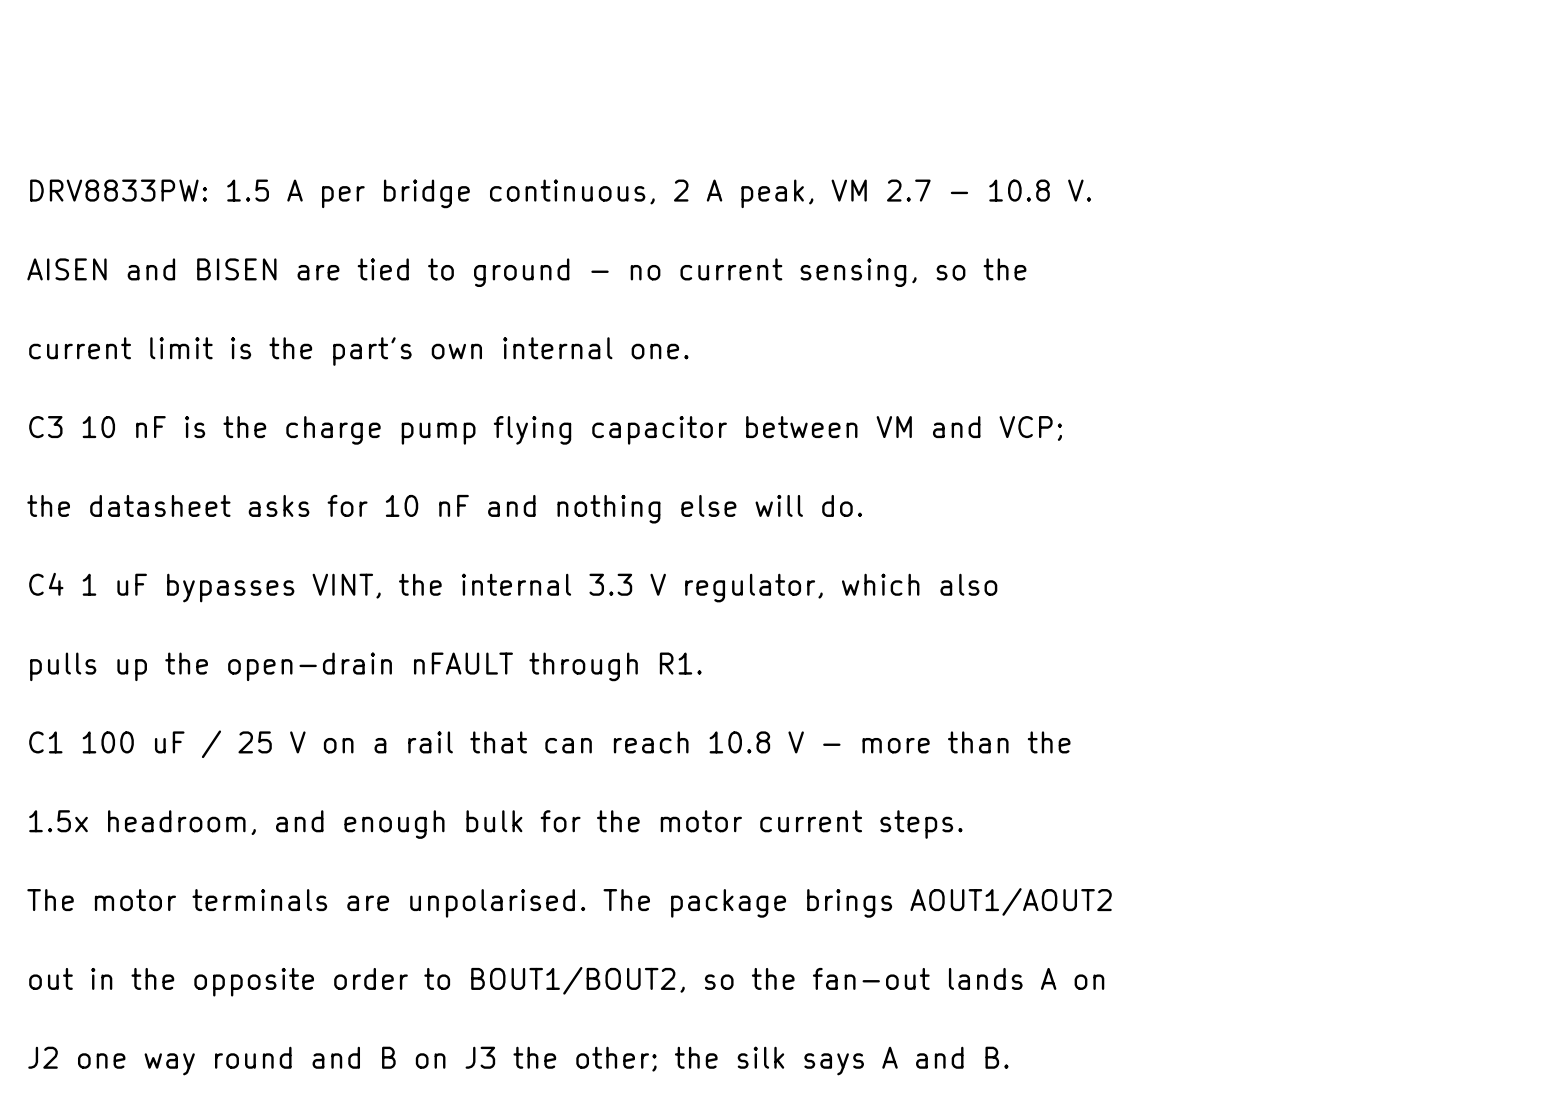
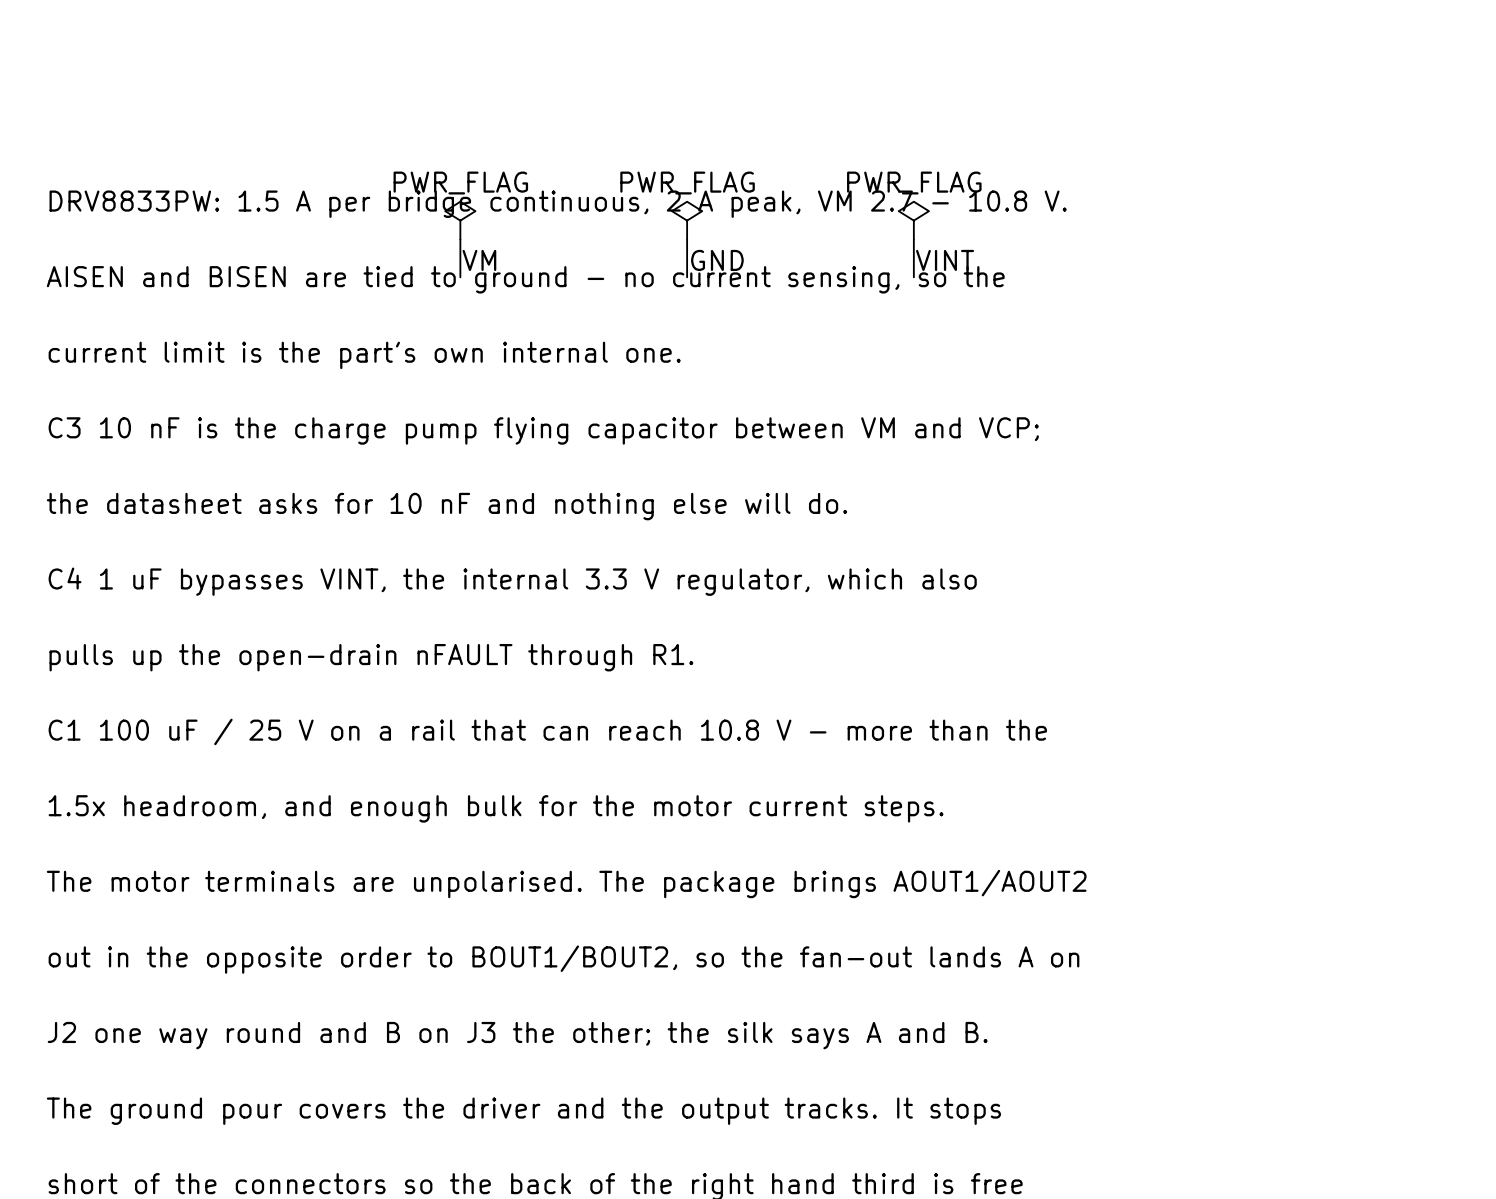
power symbol: none -> PWR_FLAG (460, 220)
power symbol: none -> PWR_FLAG (687, 220)
power symbol: none -> PWR_FLAG (913, 220)
wire: none -> (460, 239) (460, 277)
wire: none -> (687, 239) (687, 277)
wire: none -> (913, 239) (913, 277)
label: none -> VM (479, 260)
label: none -> GND (717, 260)
label: none -> VINT (945, 260)

